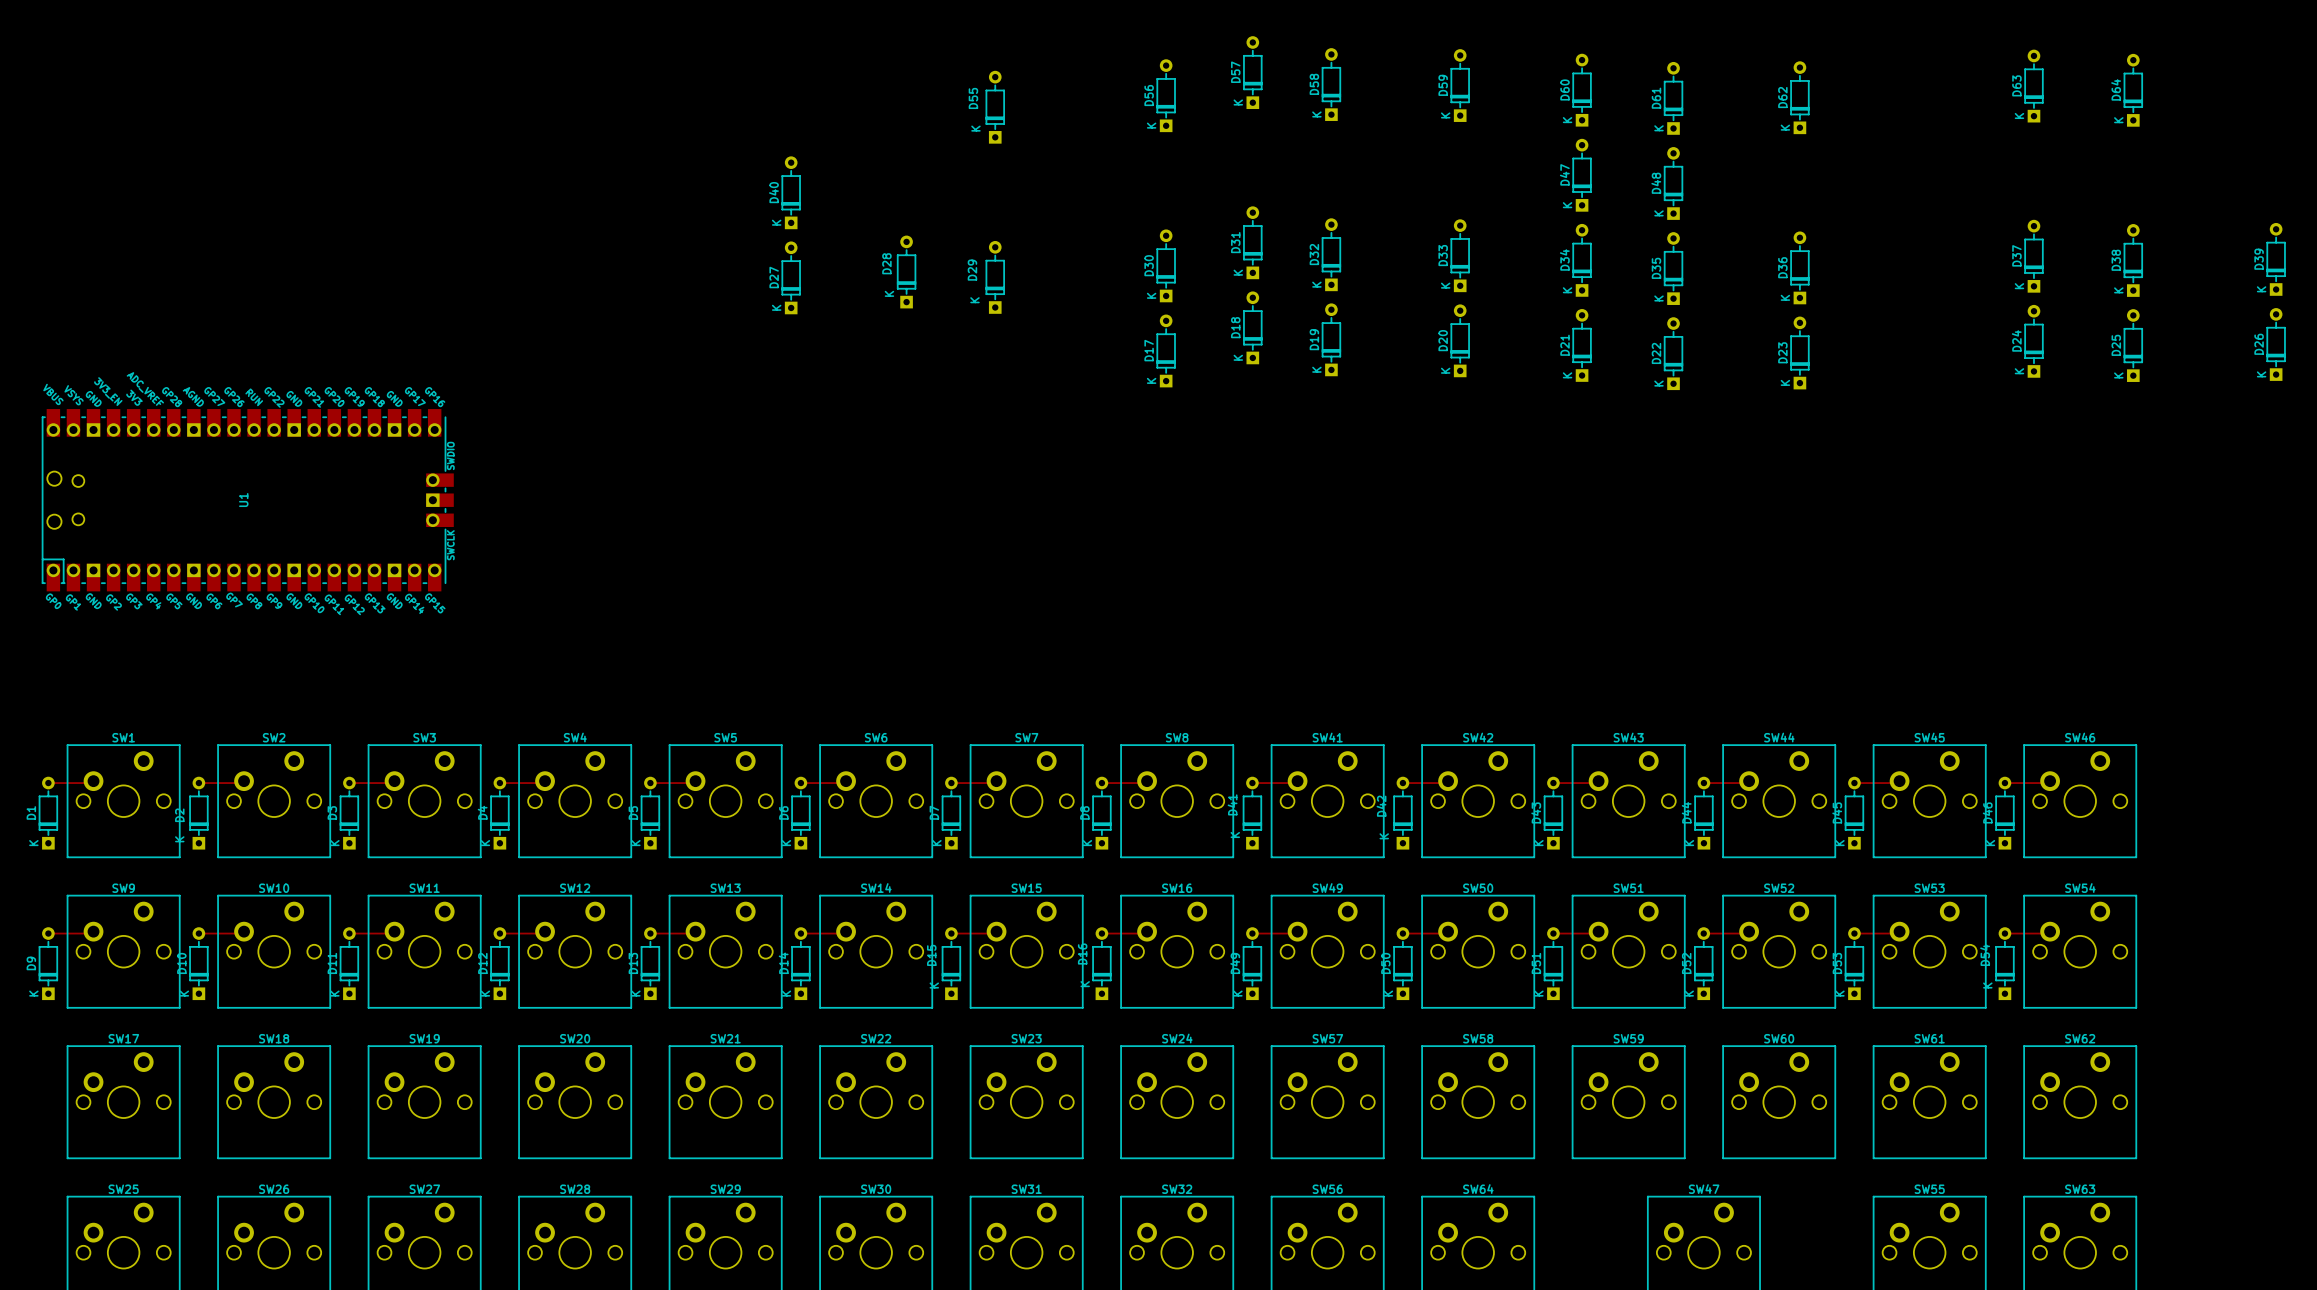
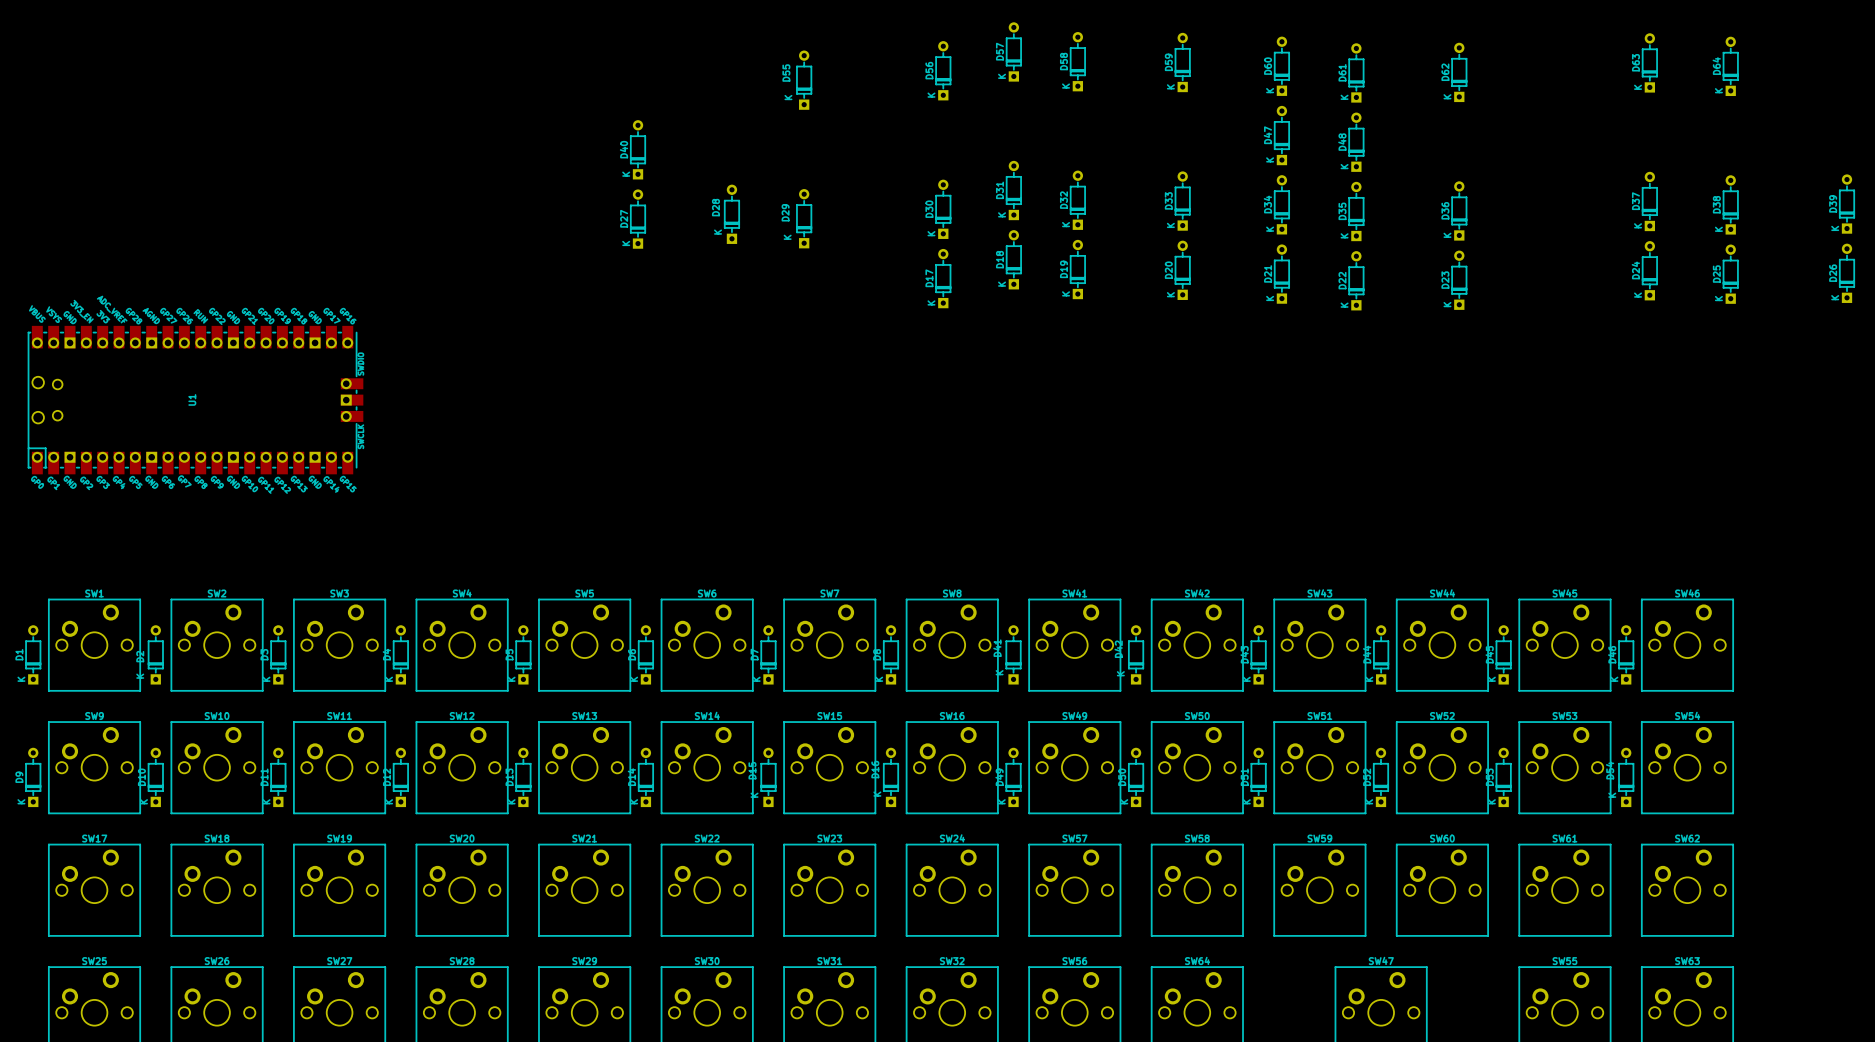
track: (93, 781) (91, 783) (48, 783) -> none
track: (244, 781) (242, 783) (198, 783) -> none
track: (394, 781) (392, 783) (349, 783) -> none
track: (545, 781) (543, 783) (499, 783) -> none
track: (695, 781) (693, 783) (650, 783) -> none
track: (846, 781) (844, 783) (800, 783) -> none
track: (996, 781) (994, 783) (951, 783) -> none
track: (1147, 781) (1145, 783) (1101, 783) -> none
track: (1297, 781) (1295, 783) (1252, 783) -> none
track: (1448, 781) (1446, 783) (1402, 783) -> none
track: (1598, 781) (1596, 783) (1553, 783) -> none
track: (1749, 781) (1747, 783) (1703, 783) -> none
track: (1899, 781) (1897, 783) (1854, 783) -> none
track: (2050, 781) (2048, 783) (2004, 783) -> none
track: (93, 931) (91, 933) (48, 933) -> none
track: (244, 931) (242, 933) (198, 933) -> none
track: (394, 931) (392, 933) (349, 933) -> none
track: (545, 931) (543, 933) (499, 933) -> none
track: (695, 931) (693, 933) (650, 933) -> none
track: (846, 931) (844, 933) (800, 933) -> none
track: (996, 931) (994, 933) (951, 933) -> none
track: (1147, 931) (1145, 933) (1101, 933) -> none
track: (1297, 931) (1295, 933) (1252, 933) -> none
track: (1448, 931) (1446, 933) (1402, 933) -> none
track: (1598, 931) (1596, 933) (1553, 933) -> none
track: (1749, 931) (1747, 933) (1703, 933) -> none
track: (1899, 931) (1897, 933) (1854, 933) -> none
track: (2050, 931) (2048, 933) (2004, 933) -> none

